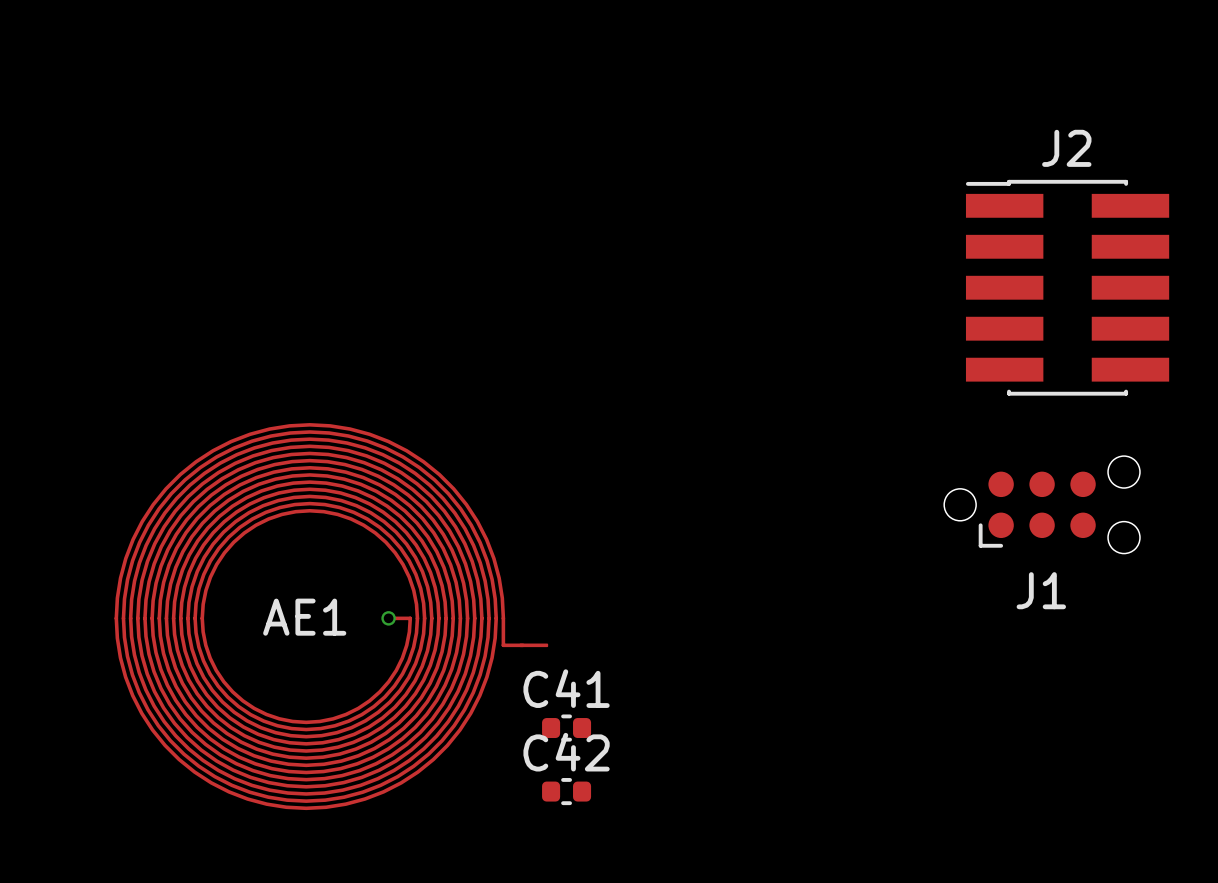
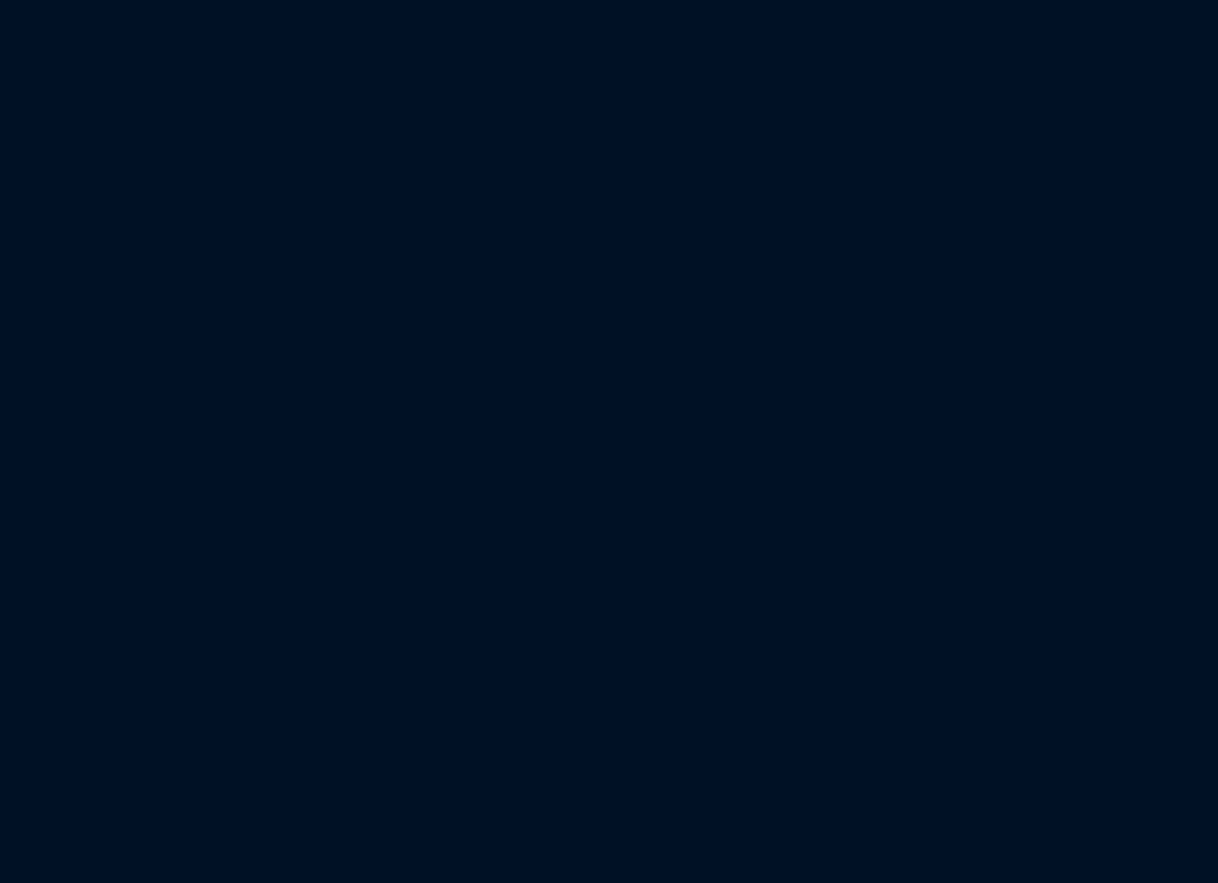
J2: (1067, 287) -> none
J1: (1042, 504) -> none
AE1: (331, 616) -> none
C41: (566, 728) -> none
C42: (566, 791) -> none

